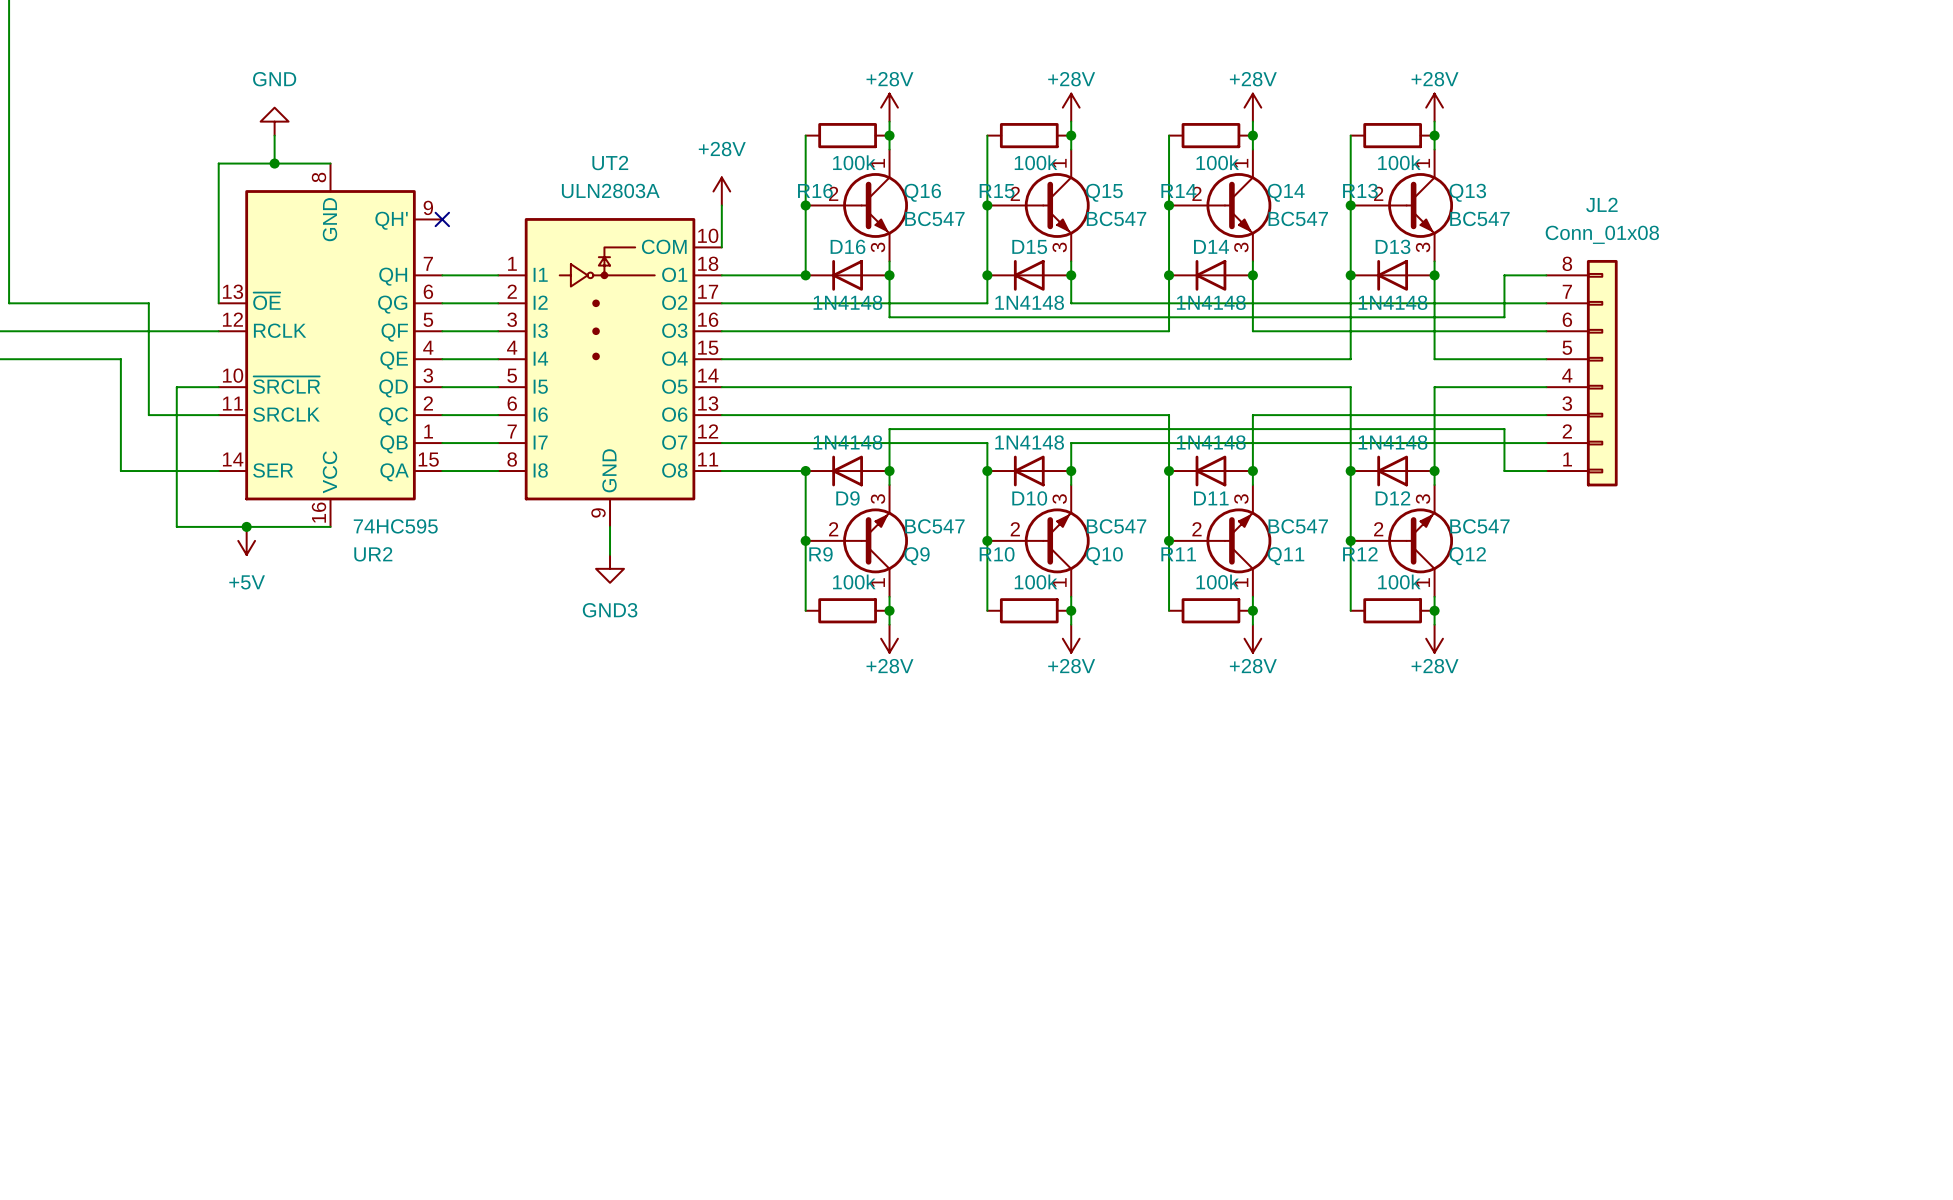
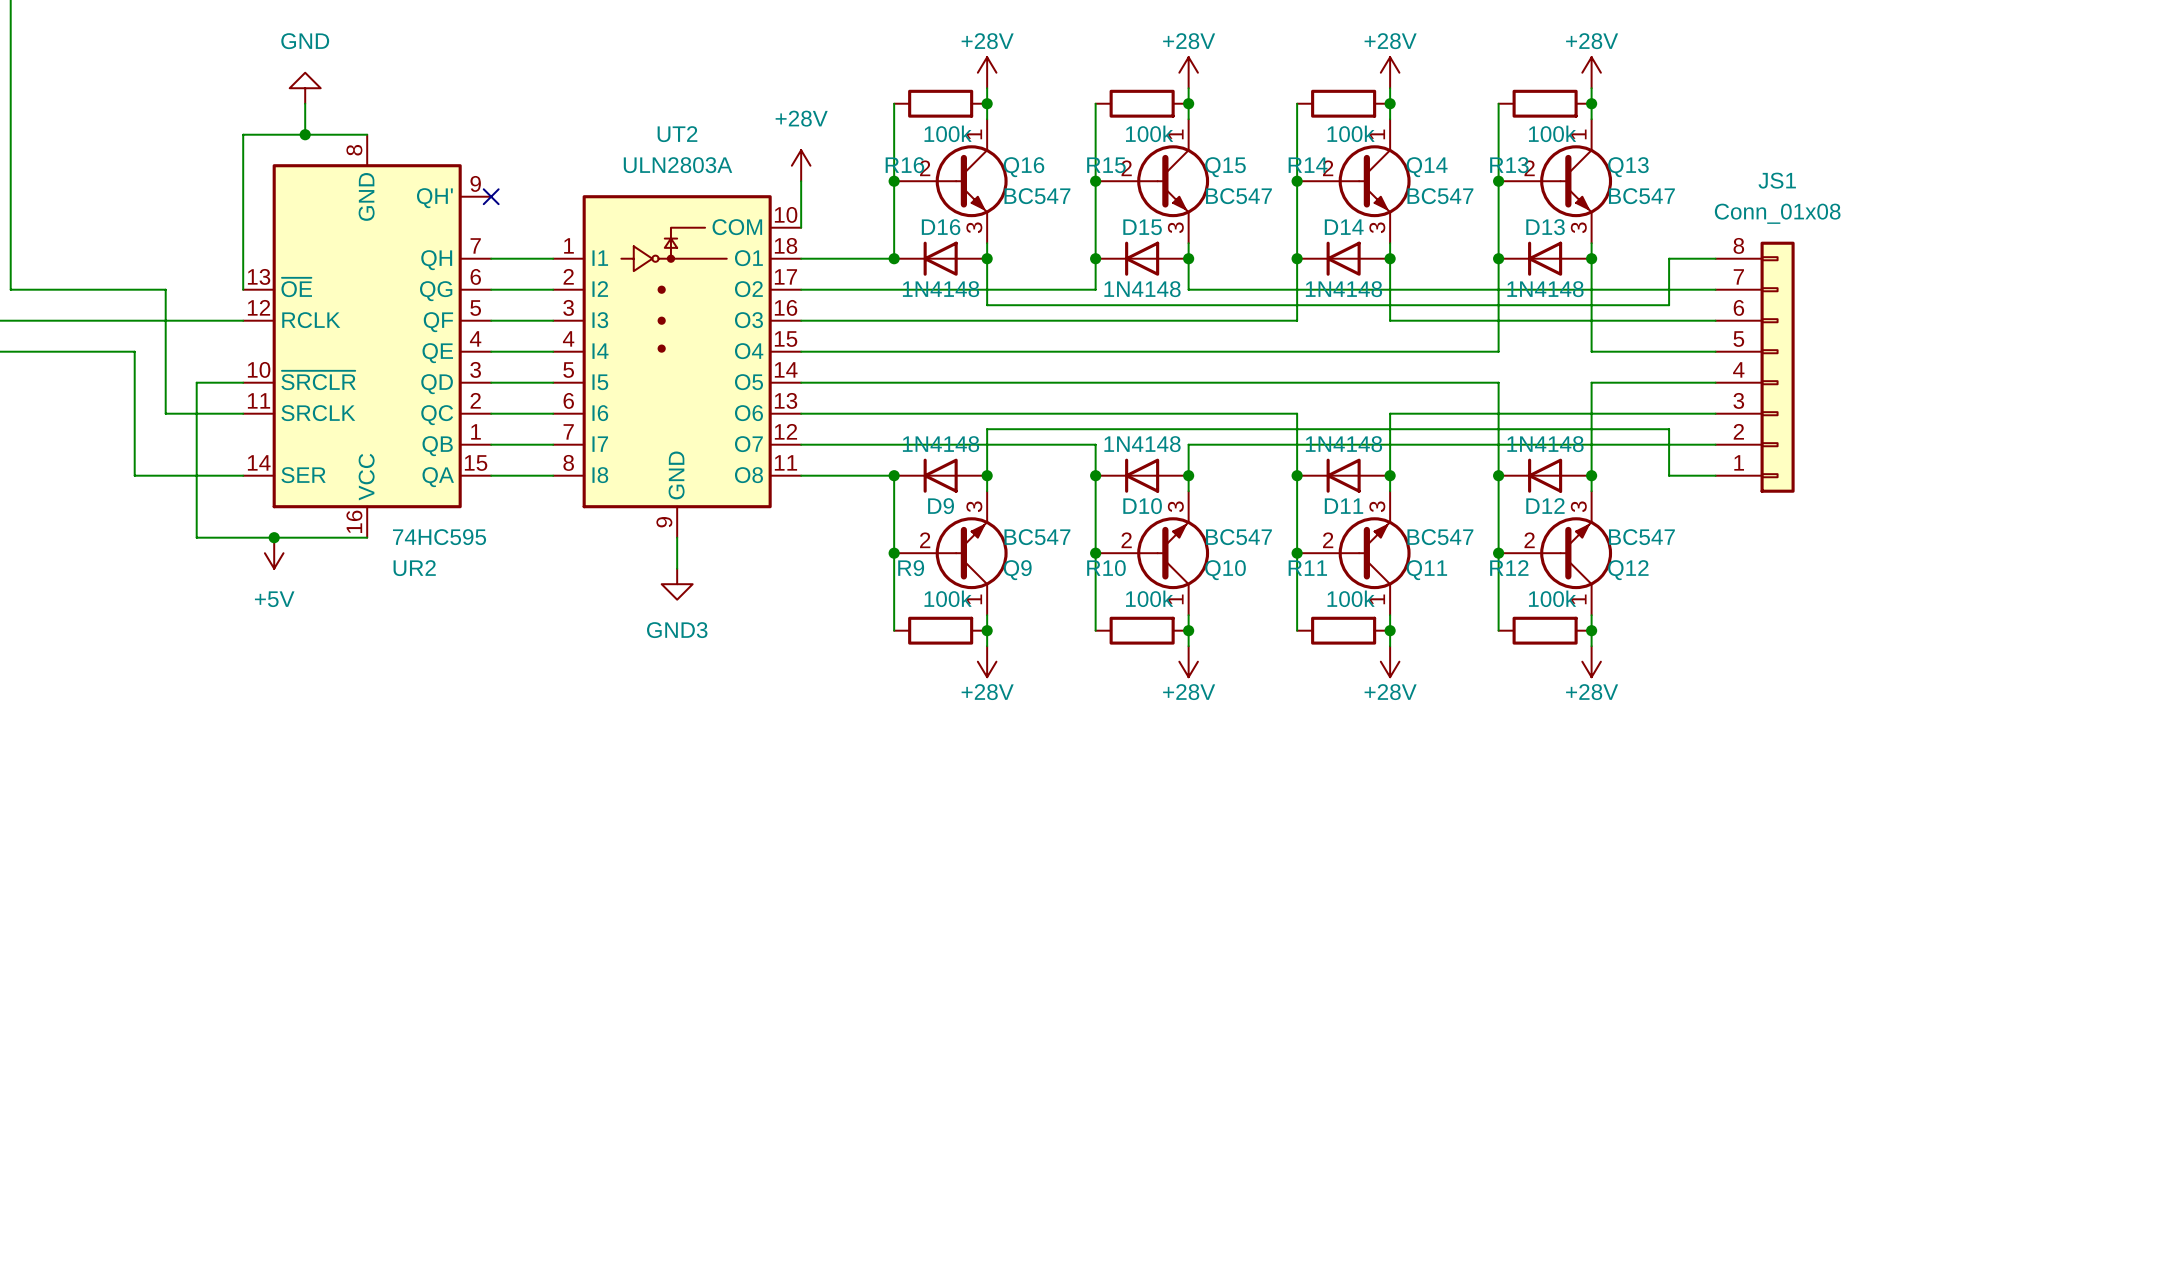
JL2 name: JL2 (1601, 204) -> JS1 (1777, 180)

